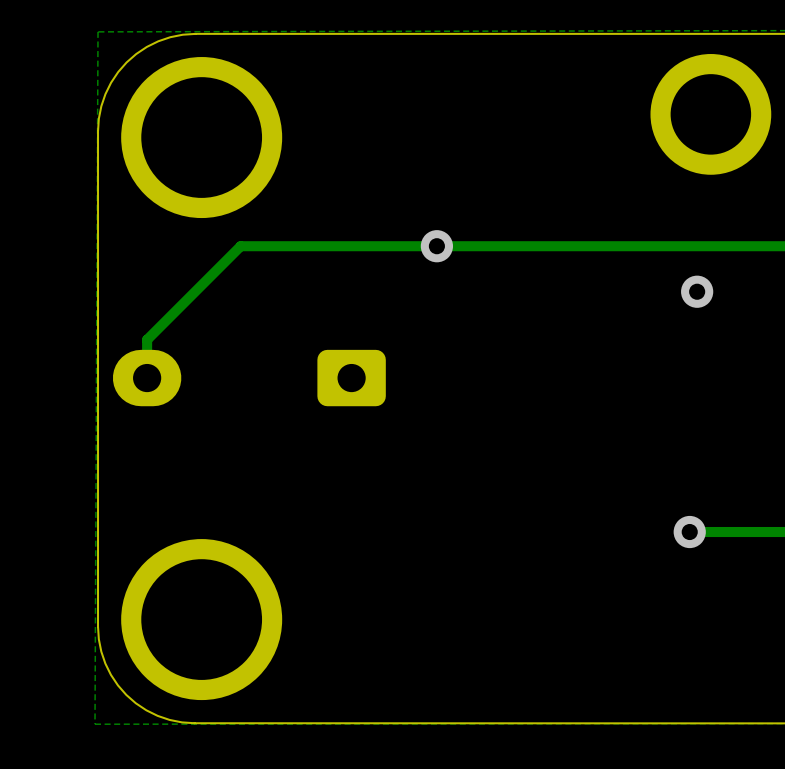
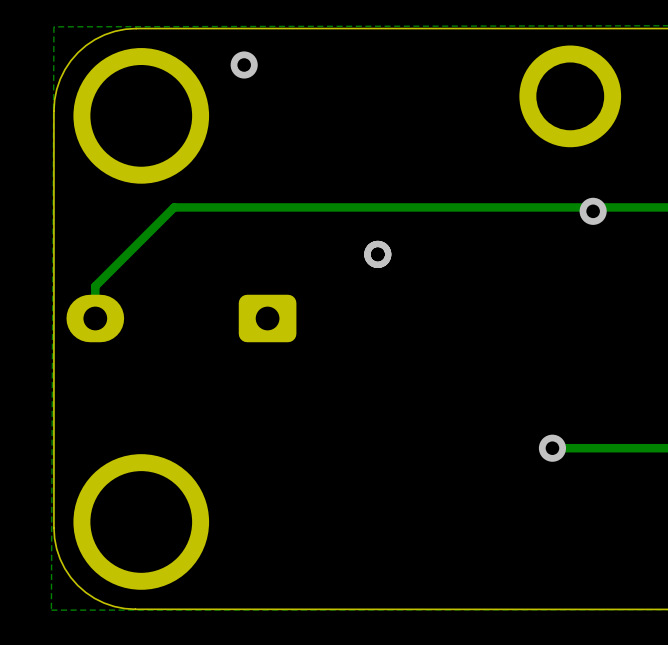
via: none -> (244, 64)
via position: (436, 246) -> (377, 254)
via position: (697, 291) -> (593, 211)

